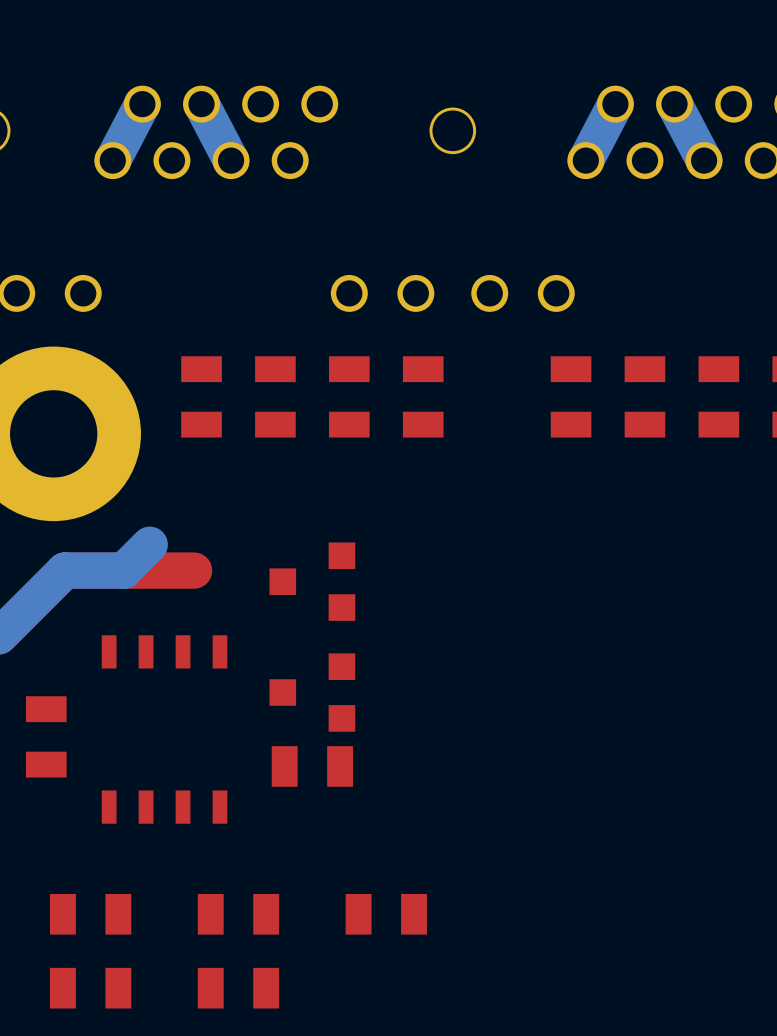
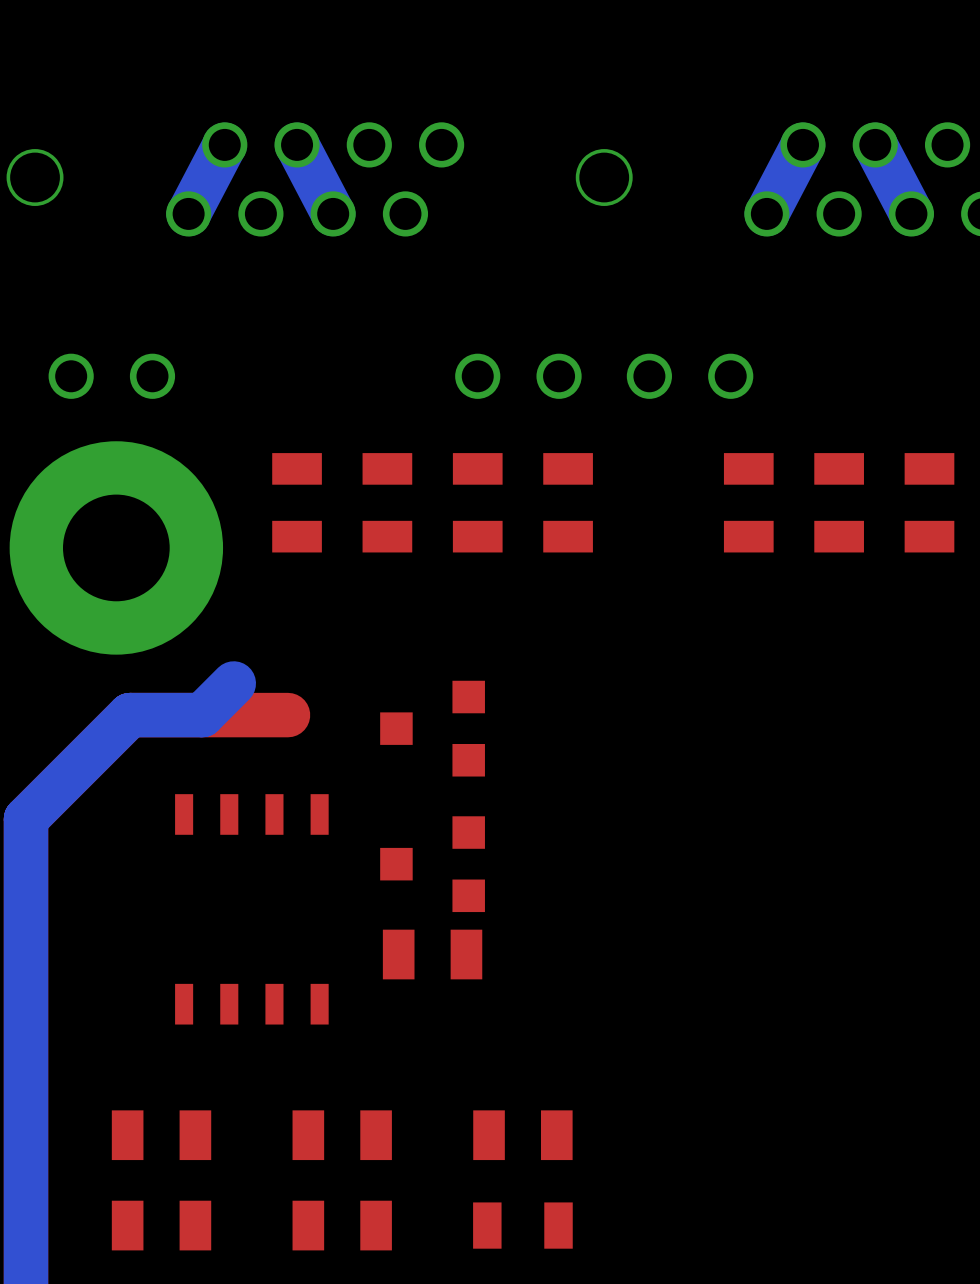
part: (46, 736) -> none
part: none -> (522, 1225)

